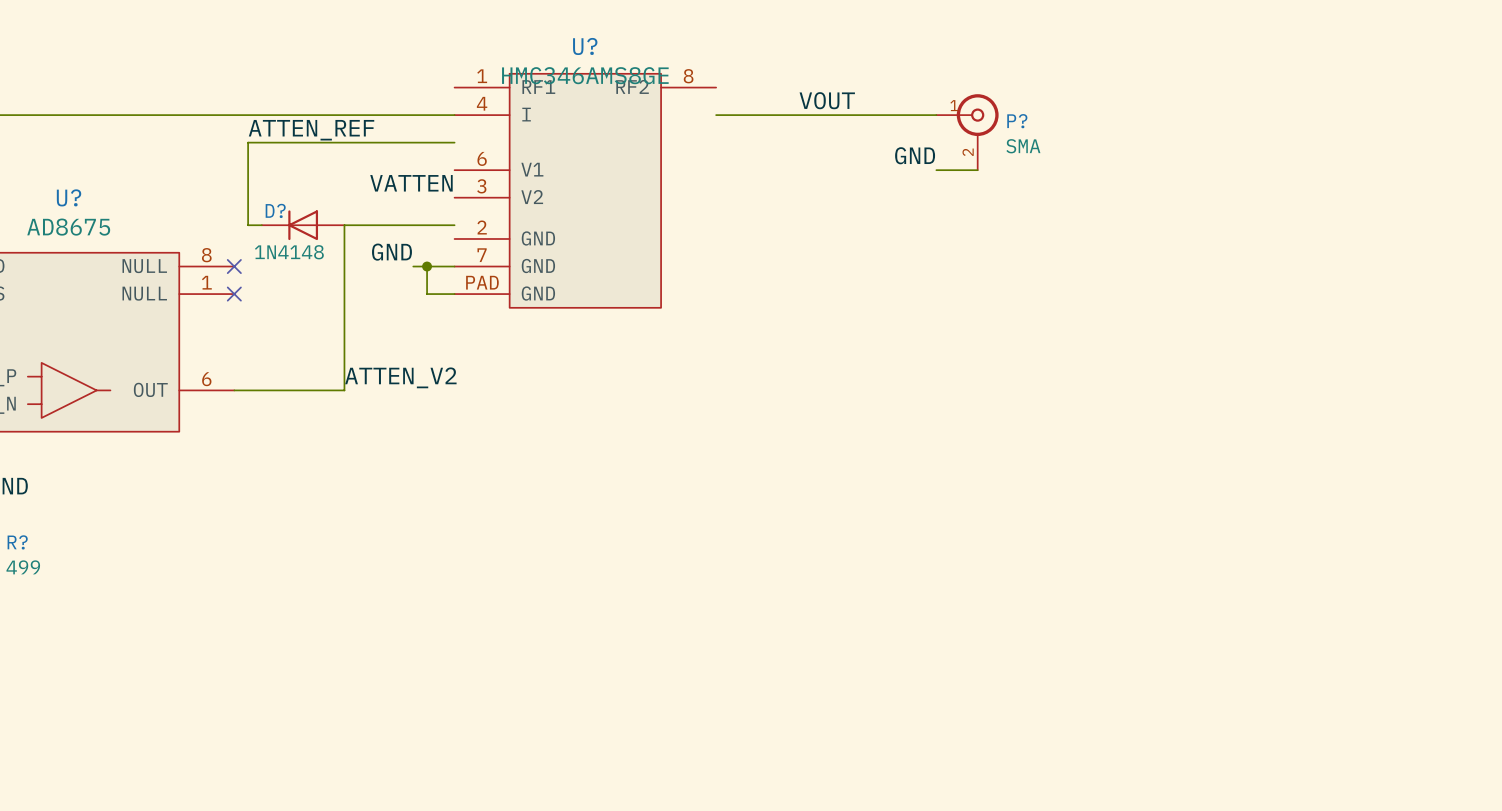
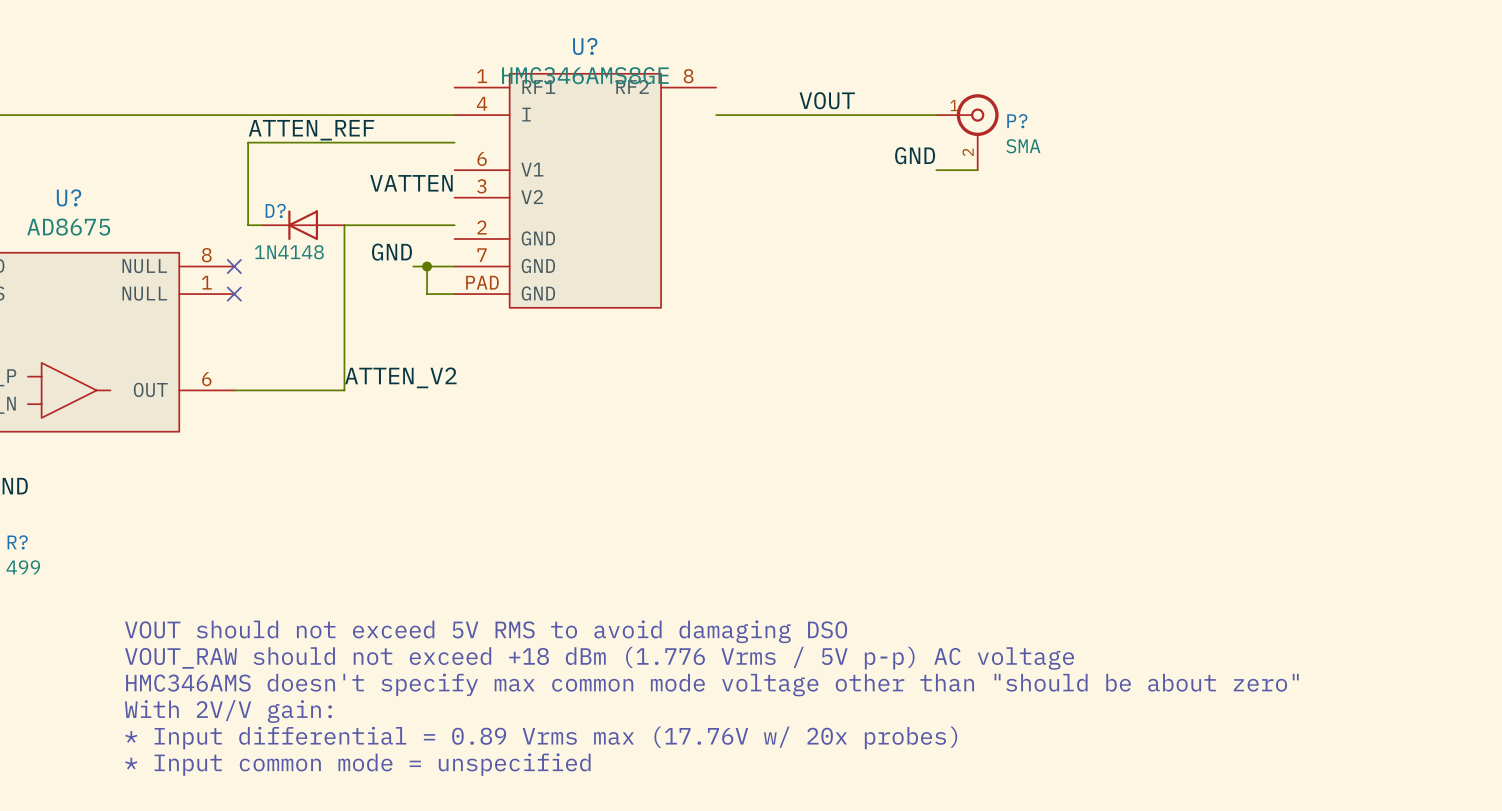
text: none -> VOUT should not exceed 5V RMS to avoid damaging DSO (486, 631)
text: none -> VOUT_RAW should not exceed +18 dBm (1.776 Vrms / 5V p-p) AC voltage (599, 658)
text: none -> HMC346AMS doesn't specify max common mode voltage other than "should be about zero" (712, 684)
text: none -> With 2V/V gain: (228, 711)
text: none -> * Input differential = 0.89 Vrms max (17.76V w/ 20x probes) (541, 737)
text: none -> * Input common mode = unspecified (357, 764)

